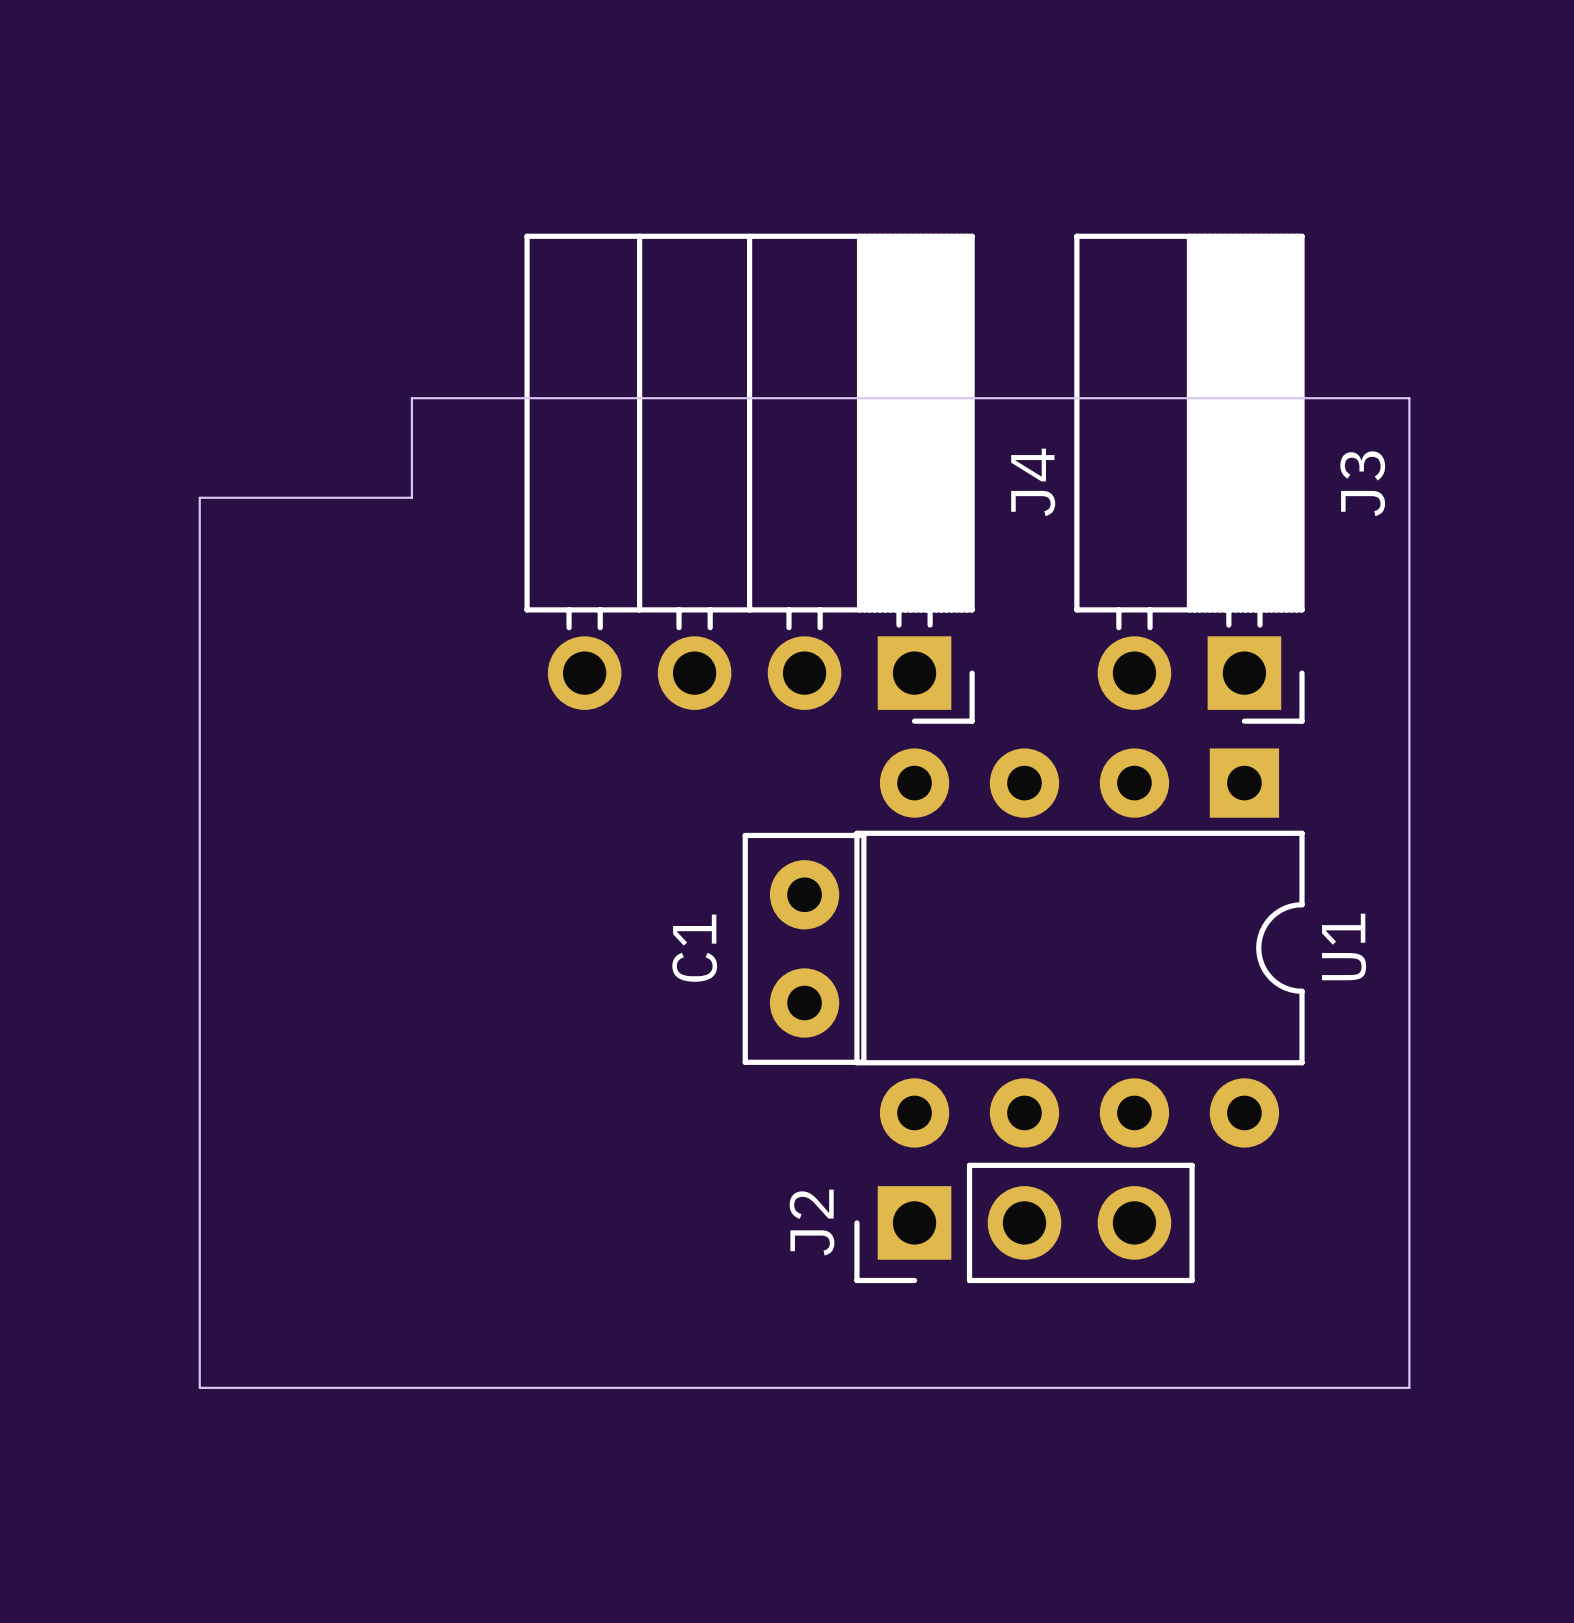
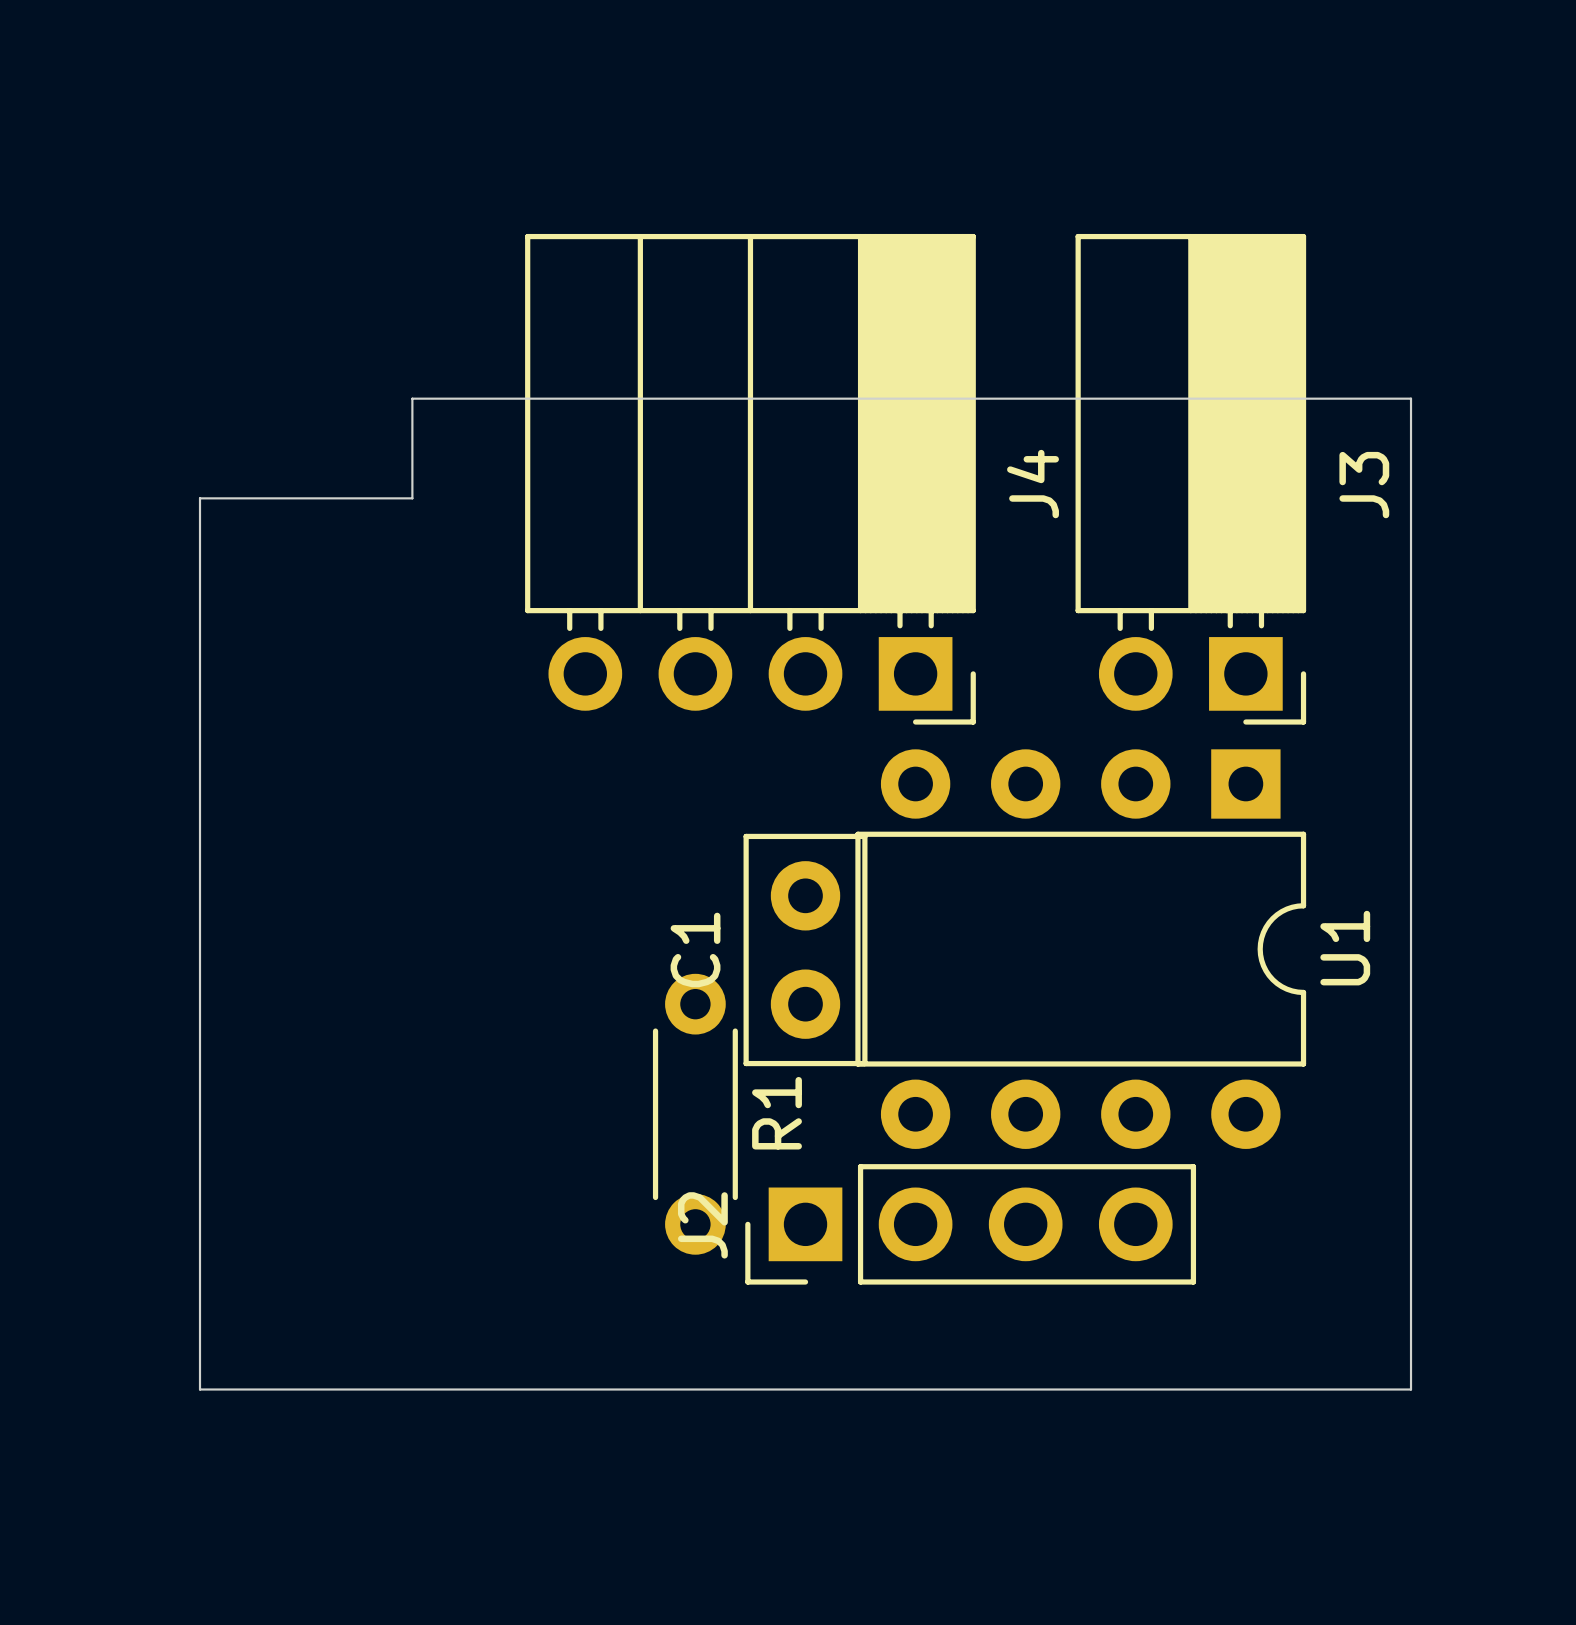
R1: none -> (695, 1114)
J2 footprint: [854, 1162, 1195, 1284] -> [745, 1164, 1197, 1285]

